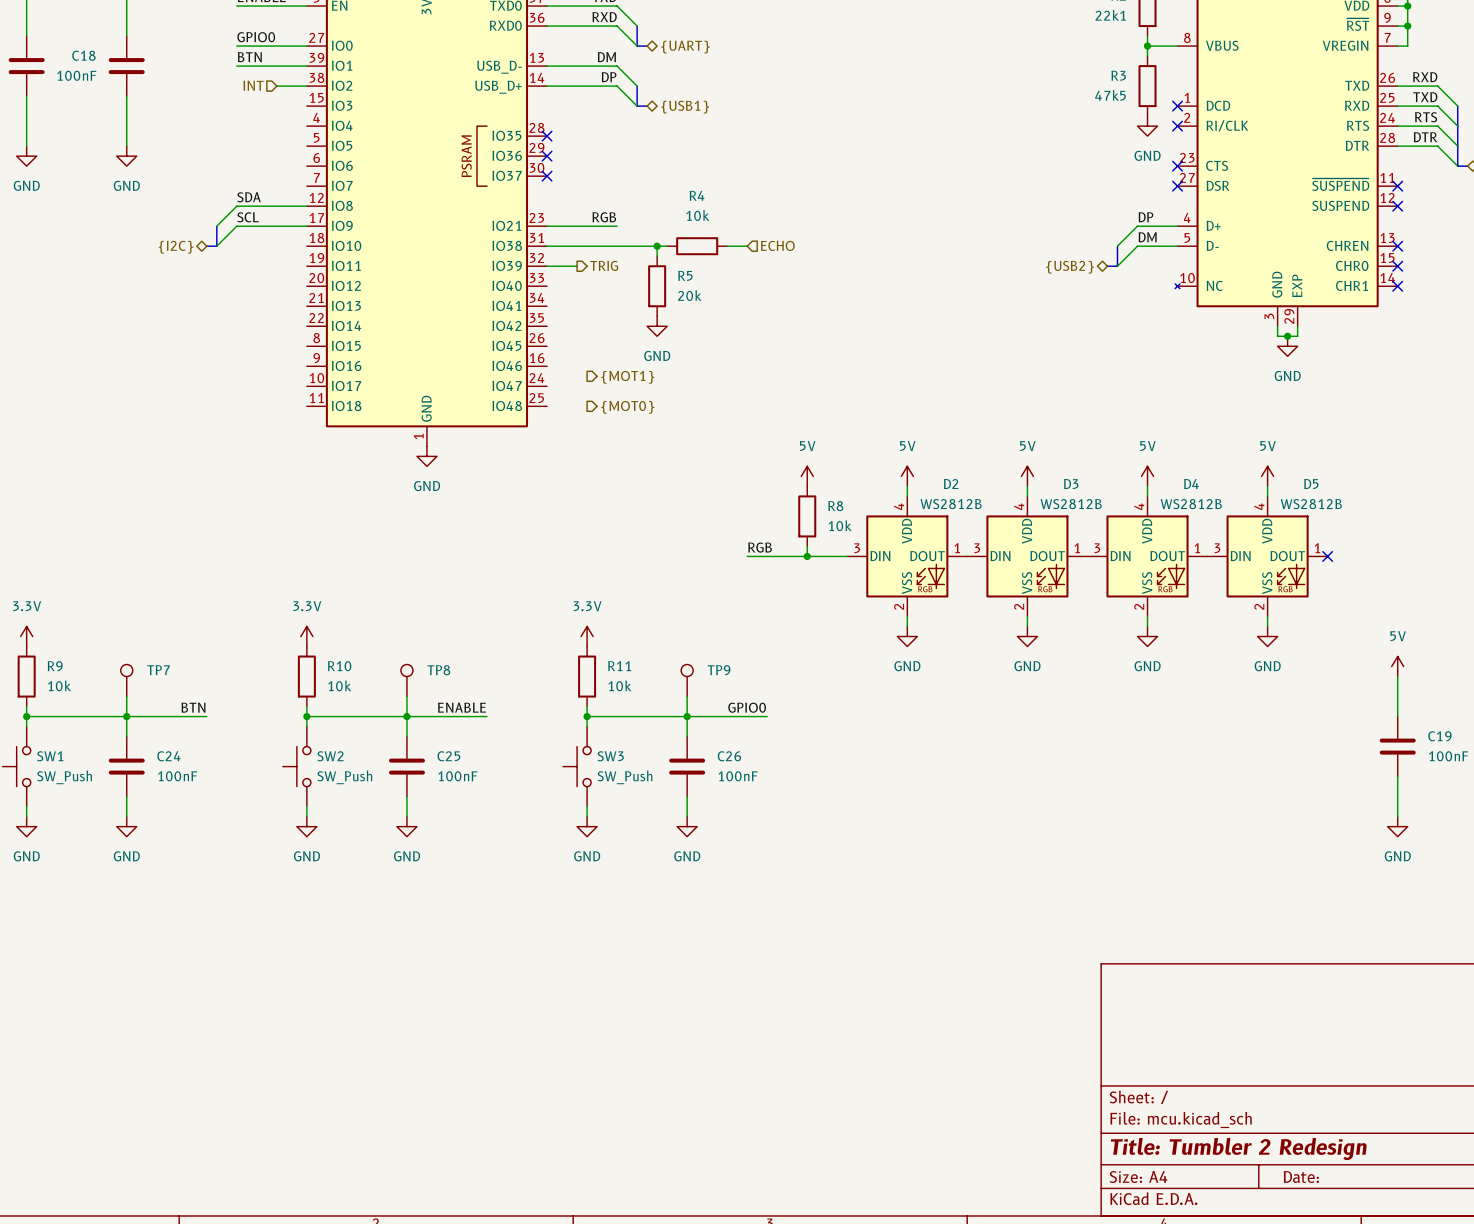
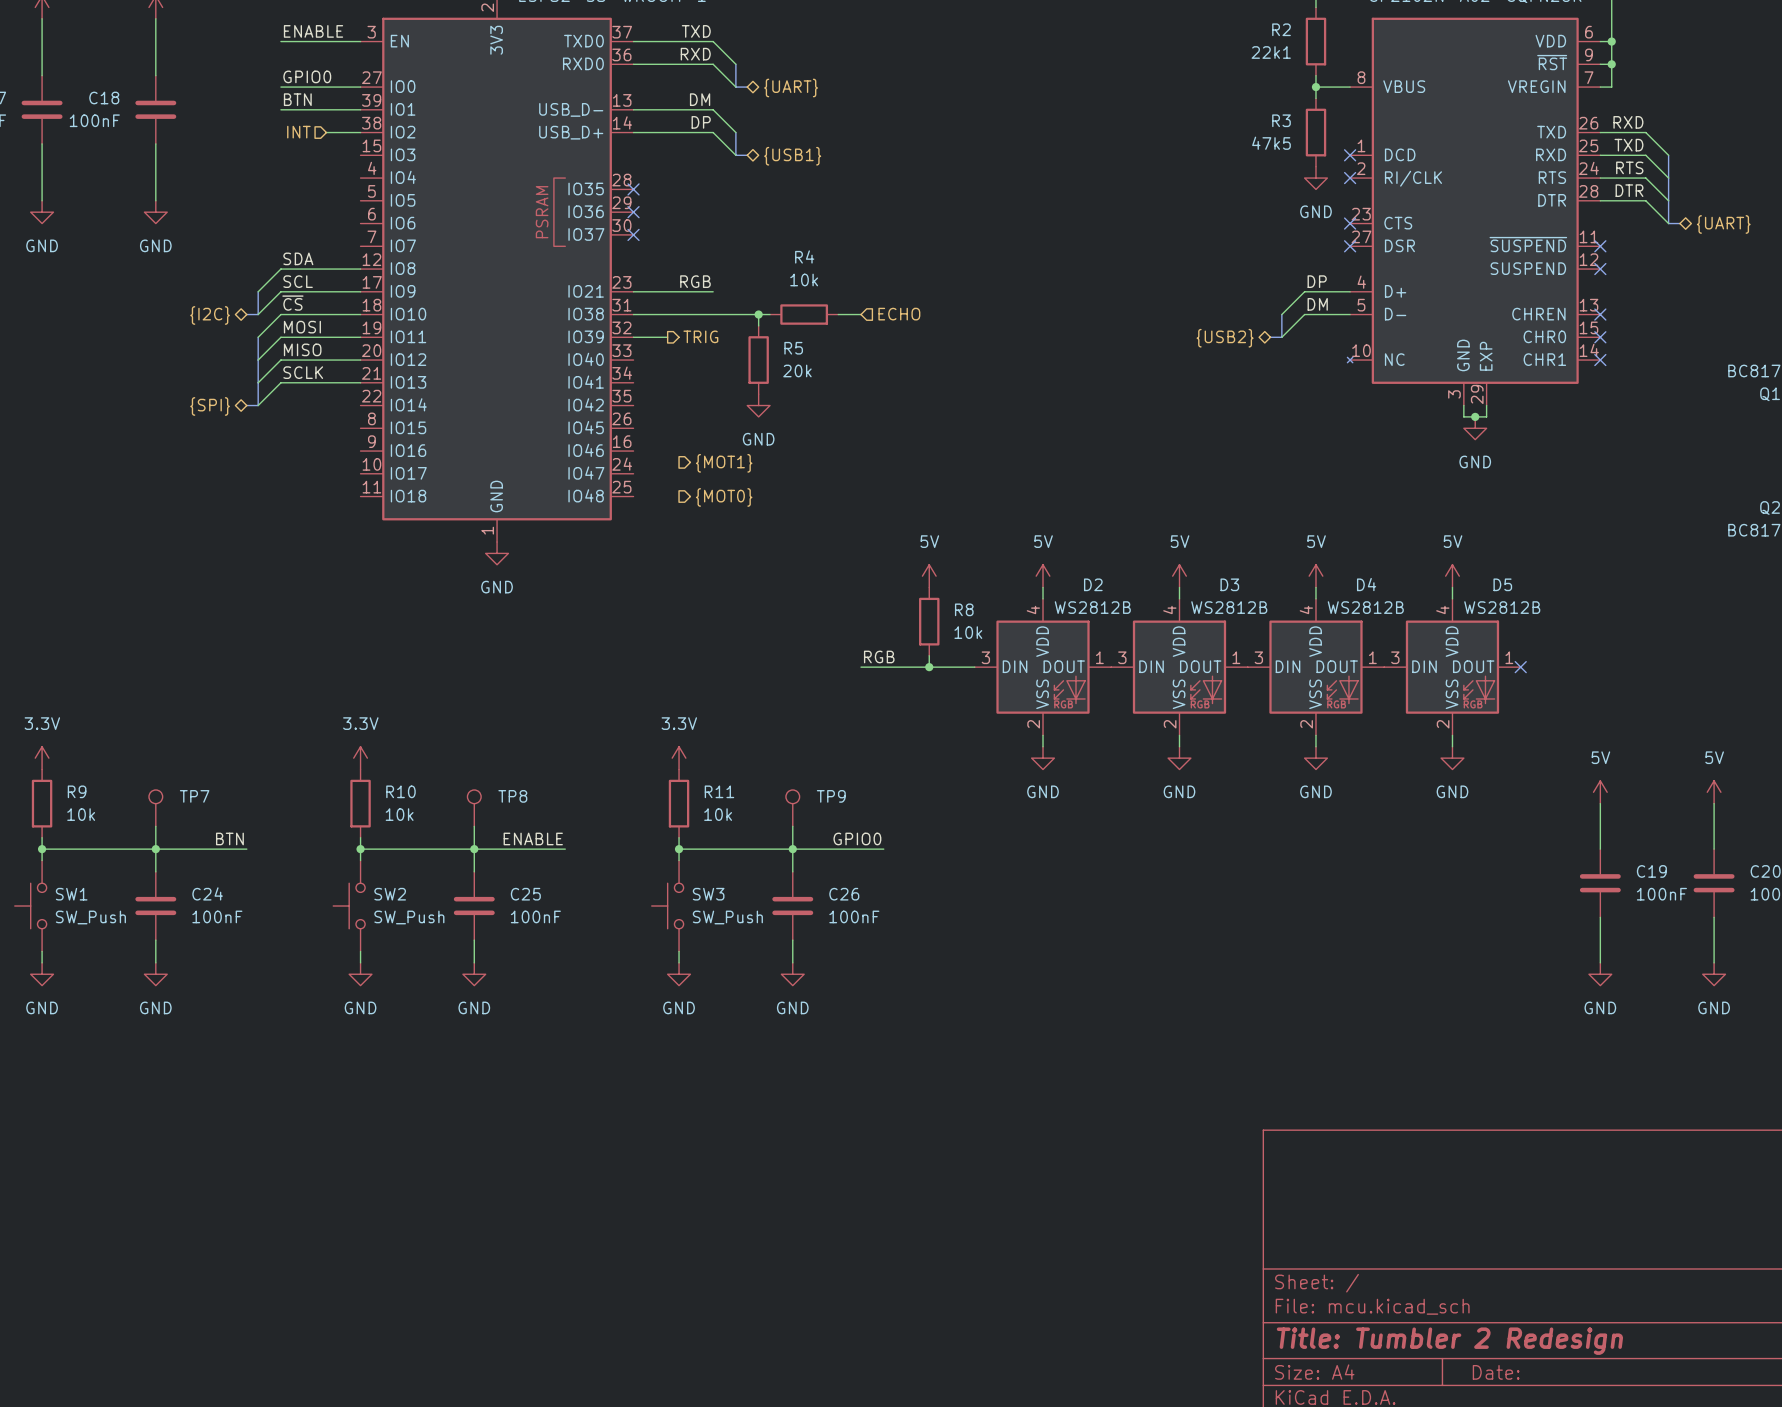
label: none -> ~{CS} (292, 303)
wire: none -> (360, 314) (280, 314) (258, 337)
label: none -> MOSI (302, 327)
bus: none -> (258, 337) (258, 405) (246, 405)
wire: none -> (360, 337) (280, 337) (258, 360)
label: none -> MISO (302, 349)
wire: none -> (360, 360) (280, 360) (258, 382)
label: none -> SCLK (303, 372)
wire: none -> (360, 382) (280, 382) (258, 405)
hierarchical label: none -> {SPI} (210, 406)

